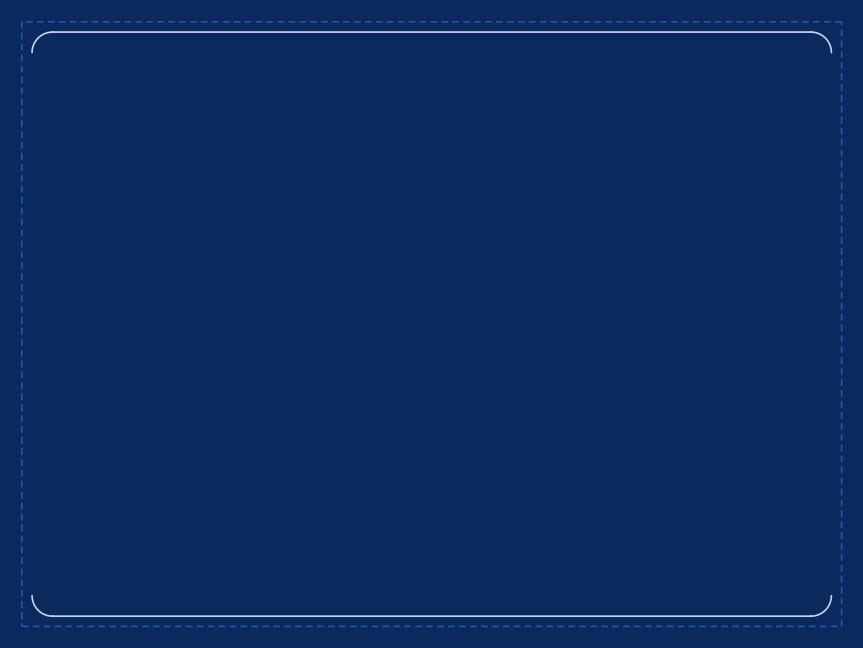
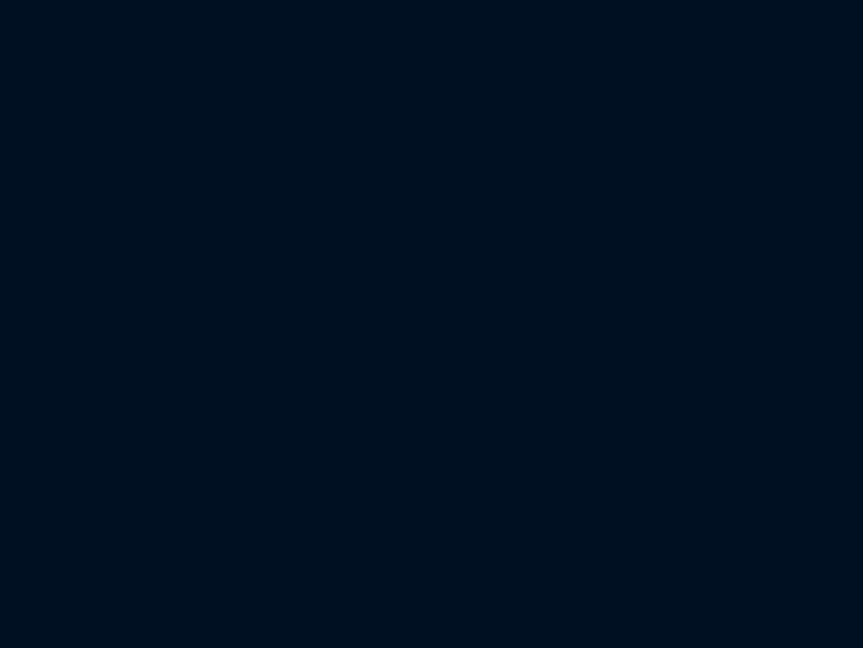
zone outline: (841, 21) (841, 626) (21, 626) (21, 21) (841, 21) -> none
board edge: (831, 52) (829, 43) (825, 38) (817, 33) (810, 32) (52, 32) (45, 33) (38, 38) (33, 45) (32, 52) -> none
board edge: (831, 595) (829, 604) (825, 610) (817, 615) (810, 616) (52, 616) (45, 615) (38, 610) (34, 604) (32, 595) -> none

